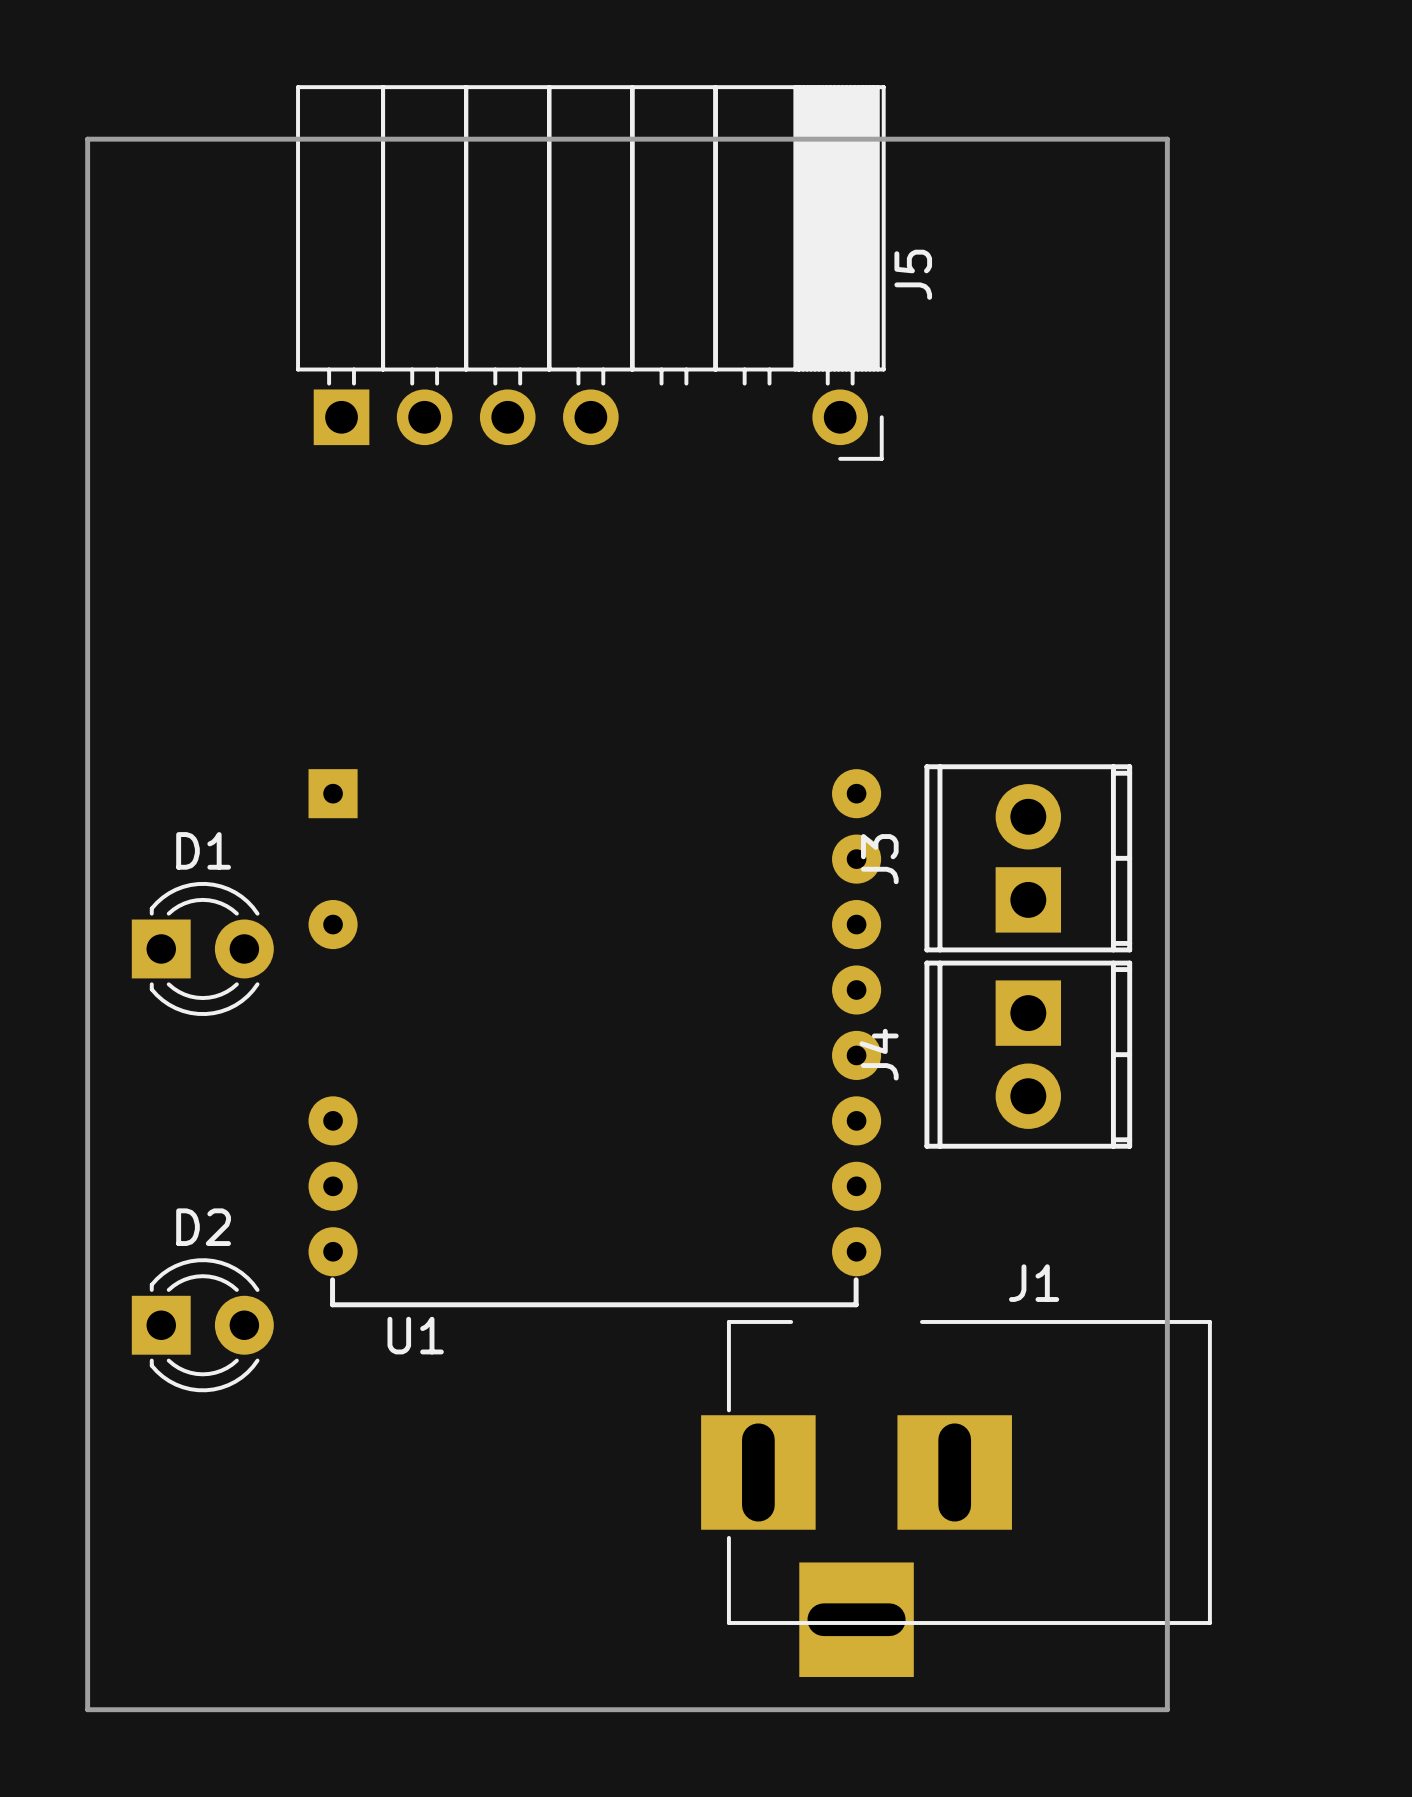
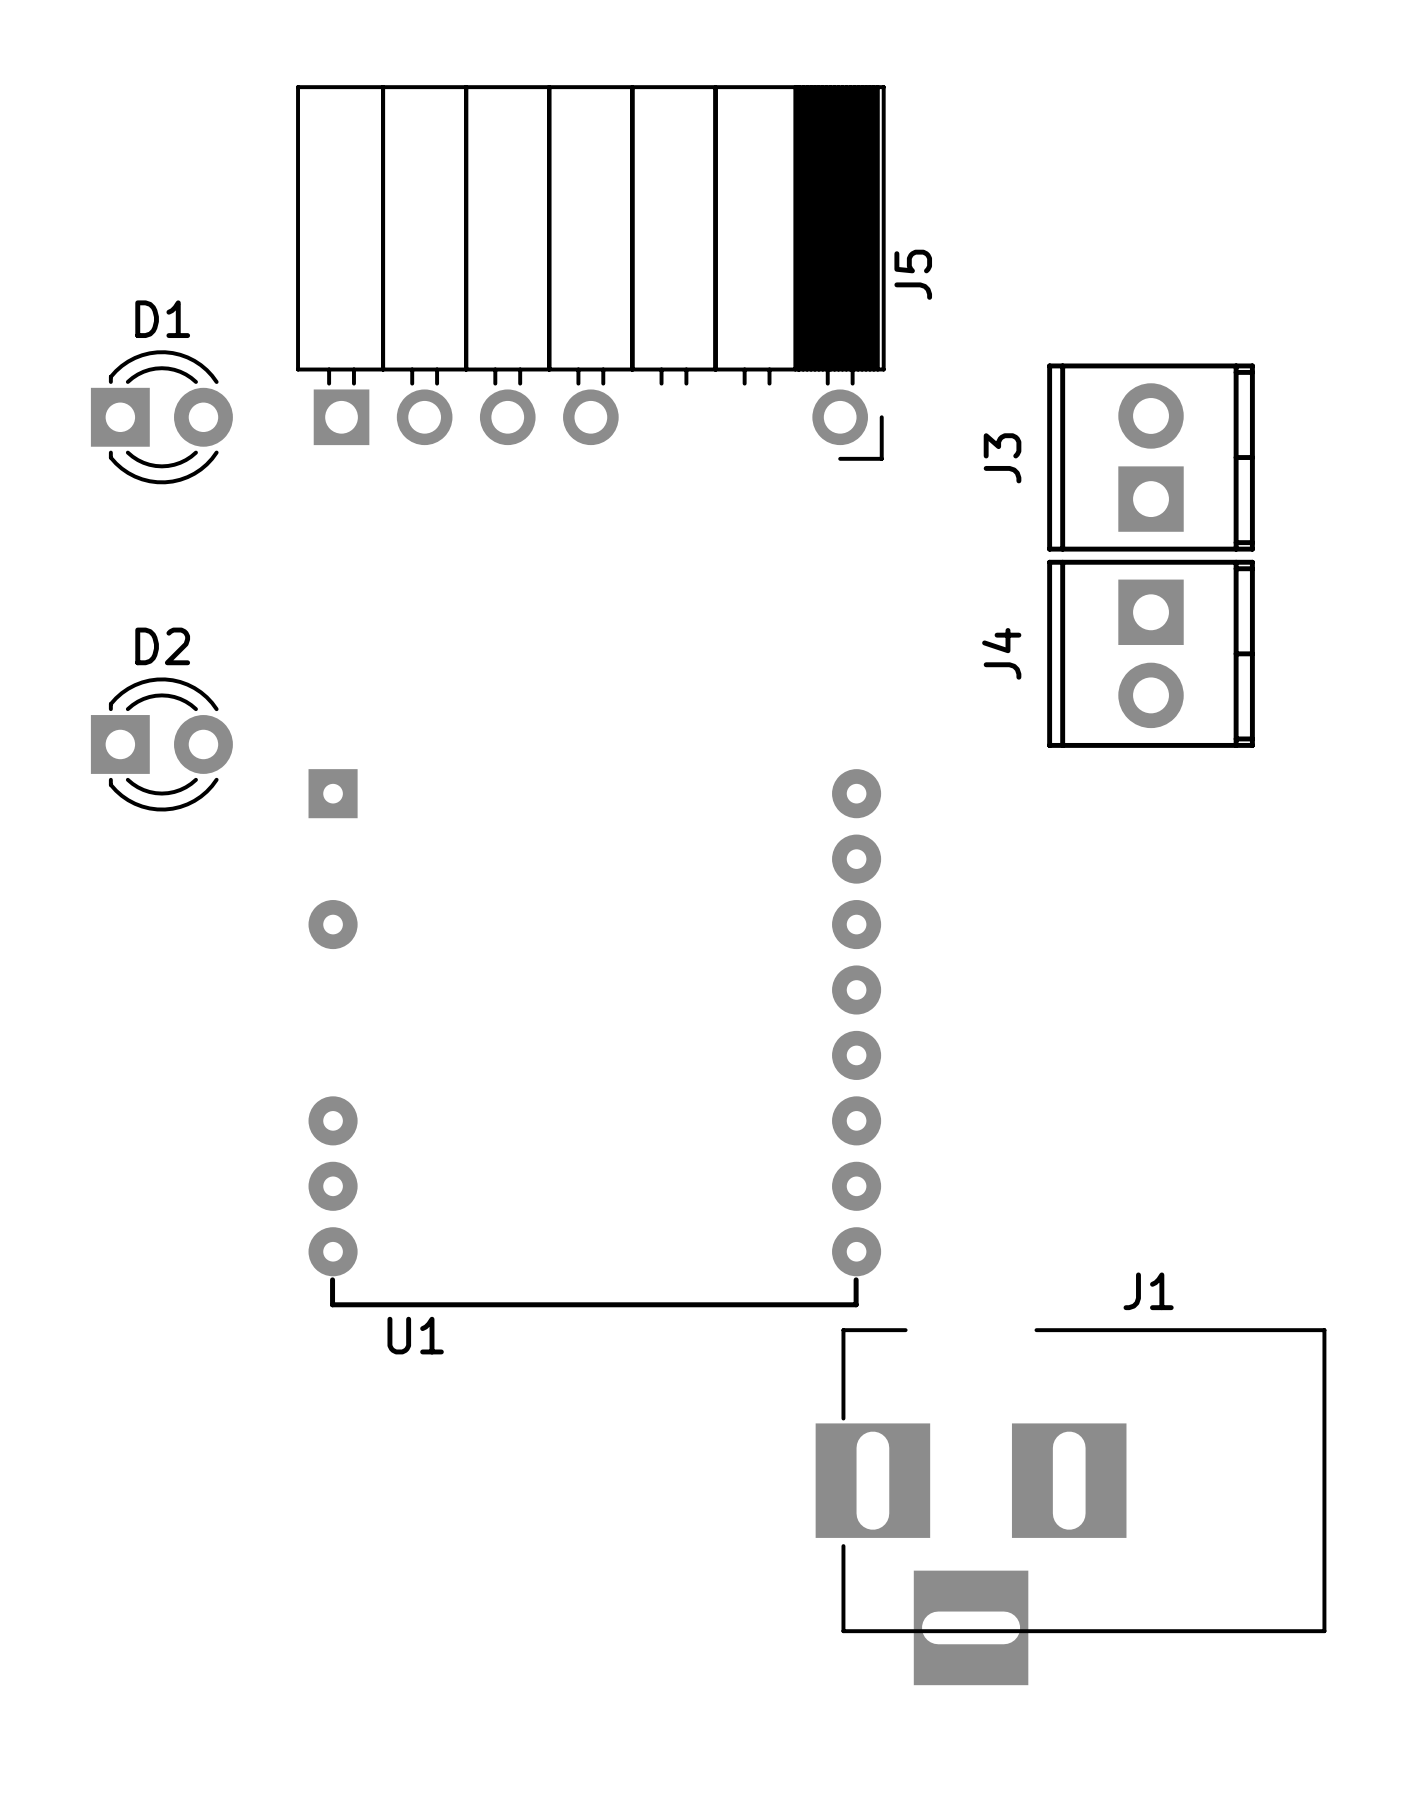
board edge: (87, 139) (87, 1709) (1167, 1709) (1167, 139) (87, 139) -> none
J3 position: (1028, 858) -> (1151, 457)
D1 position: (202, 948) -> (161, 417)
J4 position: (1028, 1054) -> (1151, 653)
D2 position: (202, 1325) -> (161, 744)
J1 position: (956, 1498) -> (1071, 1506)

